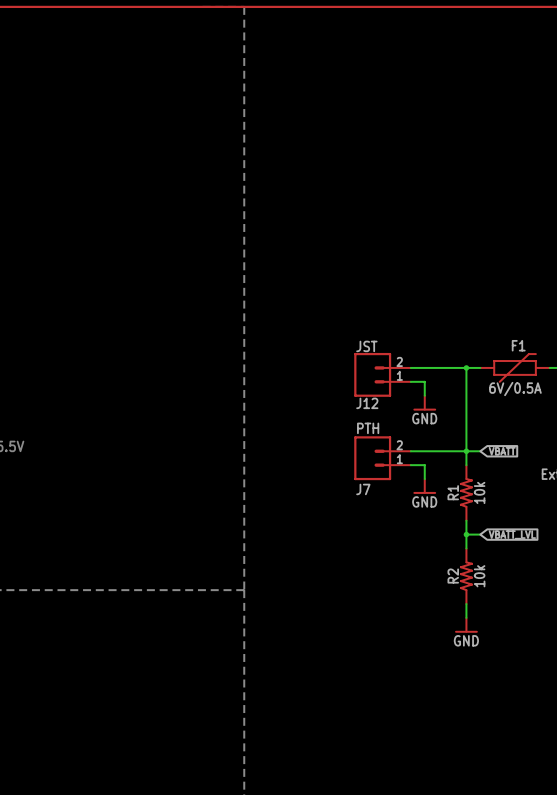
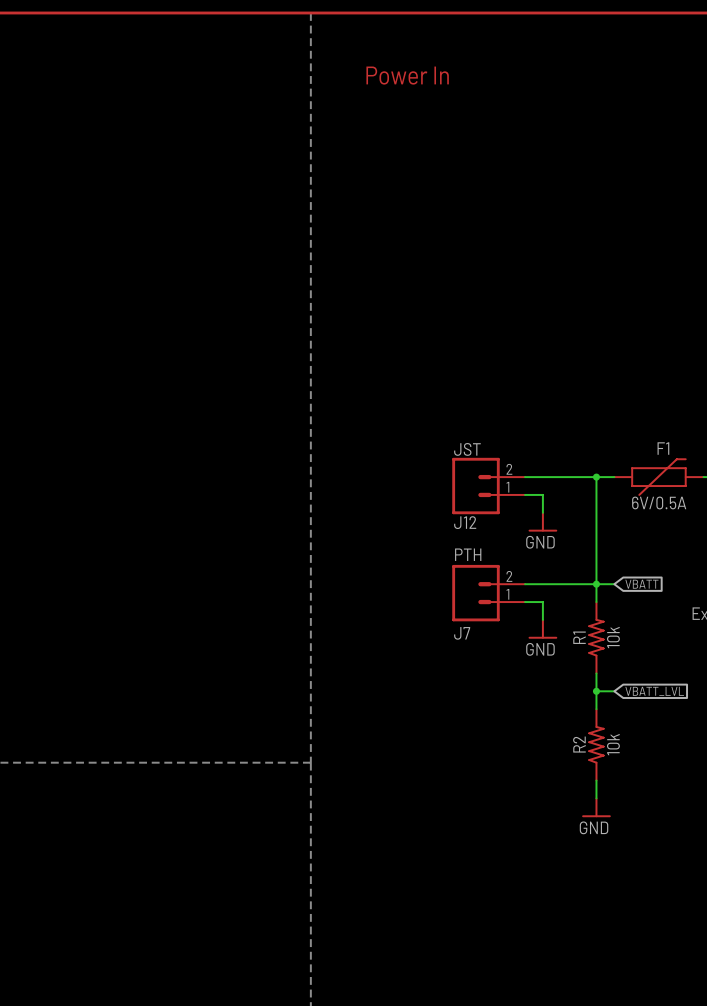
text: none -> Power In (407, 75)

